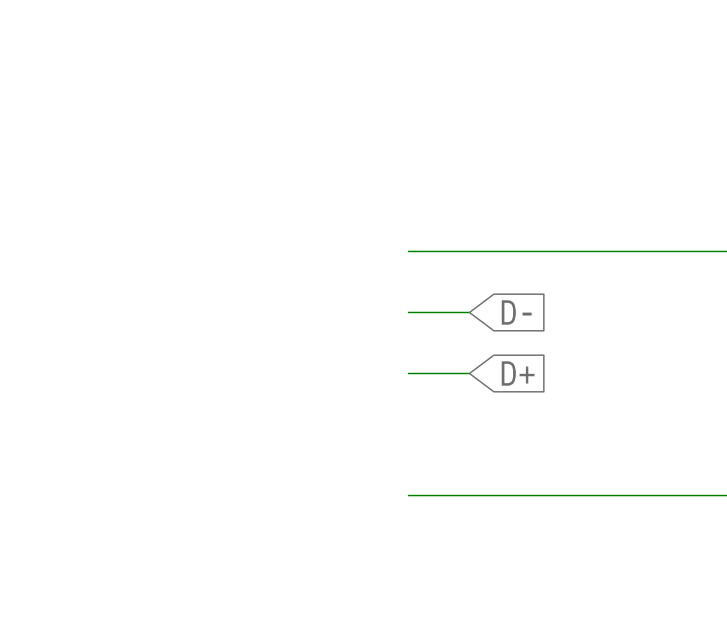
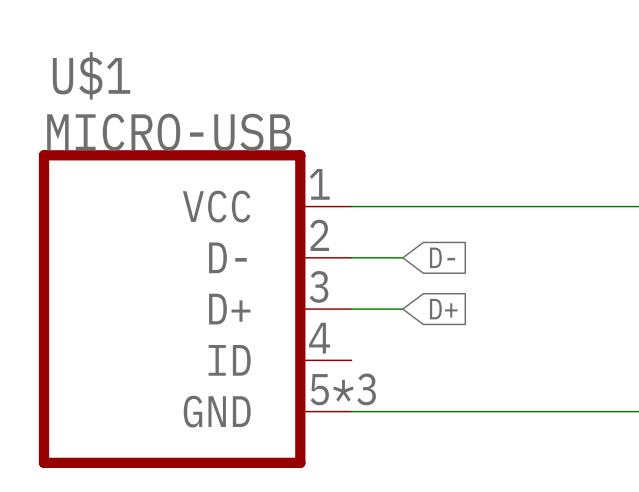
U$1: none -> MICRO-USB (195, 309)

